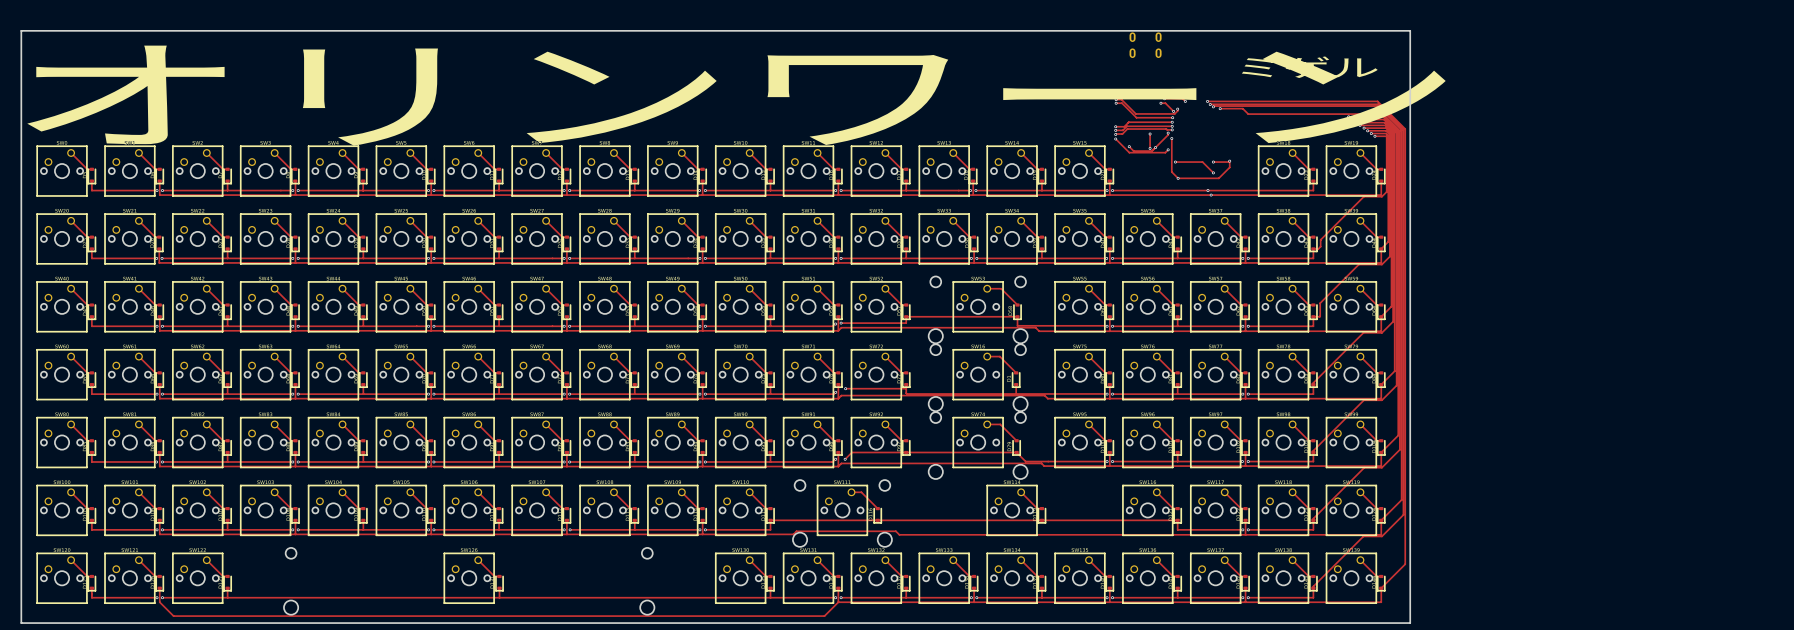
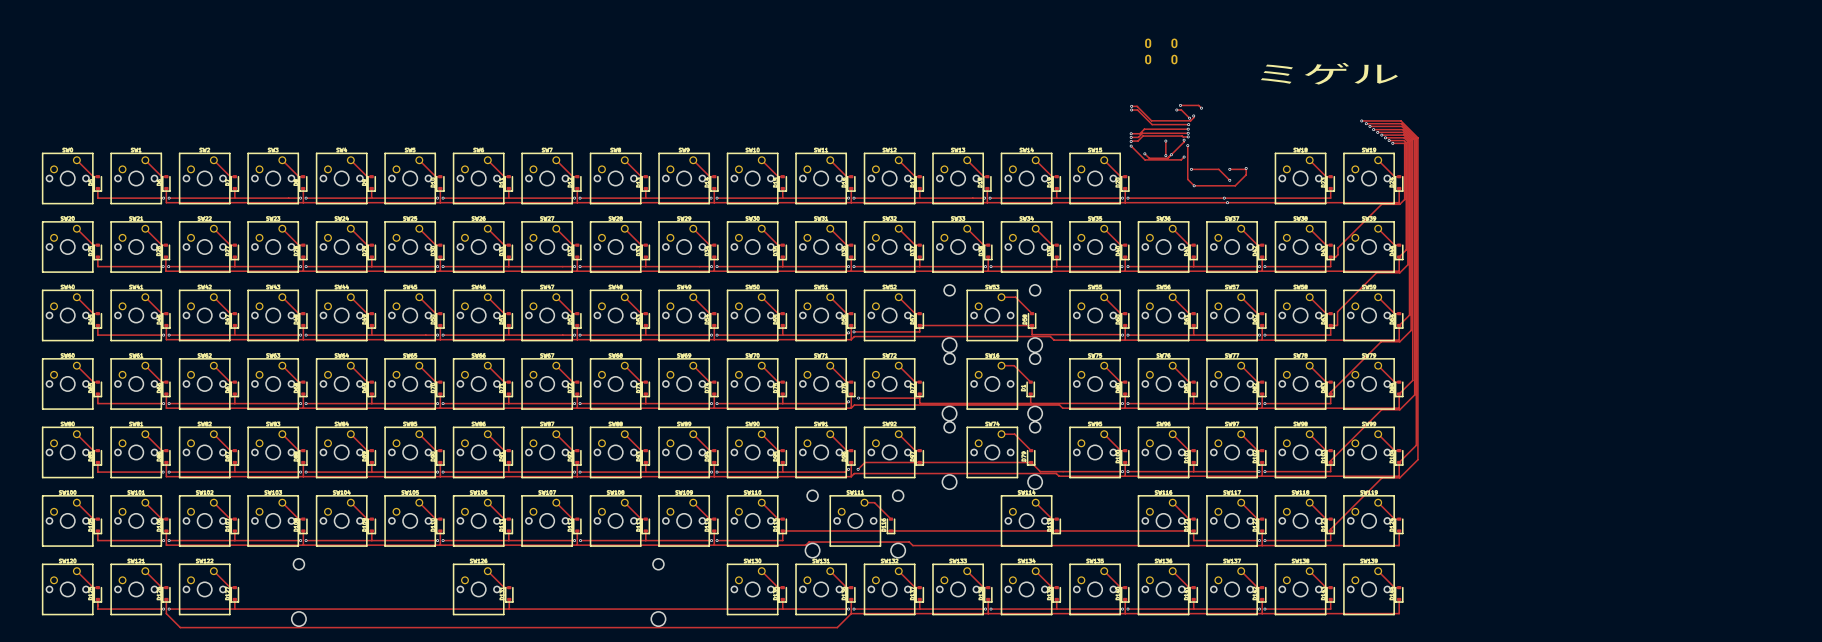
board edge: (21, 30) (1410, 30) (1410, 623) (21, 623) (21, 30) -> none
text: オリンワーン (736, 95) -> none
track: (1207, 101) (1377, 101) (1405, 129) (1405, 564) (1381, 588) -> none
via: (1207, 101) -> none
track: (1210, 104) (1378, 104) (1403, 129) (1403, 514) (1381, 536) (1363, 536) (1313, 588) -> none
via: (1210, 104) -> none
track: (1213, 106) (1377, 106) (1401, 129) (1401, 499) (1381, 520) -> none
via: (1213, 106) -> none
track: (1220, 108) (1242, 108) (1248, 114) (1344, 114) -> none
via: (1220, 108) -> none
via: none -> (1361, 120)

